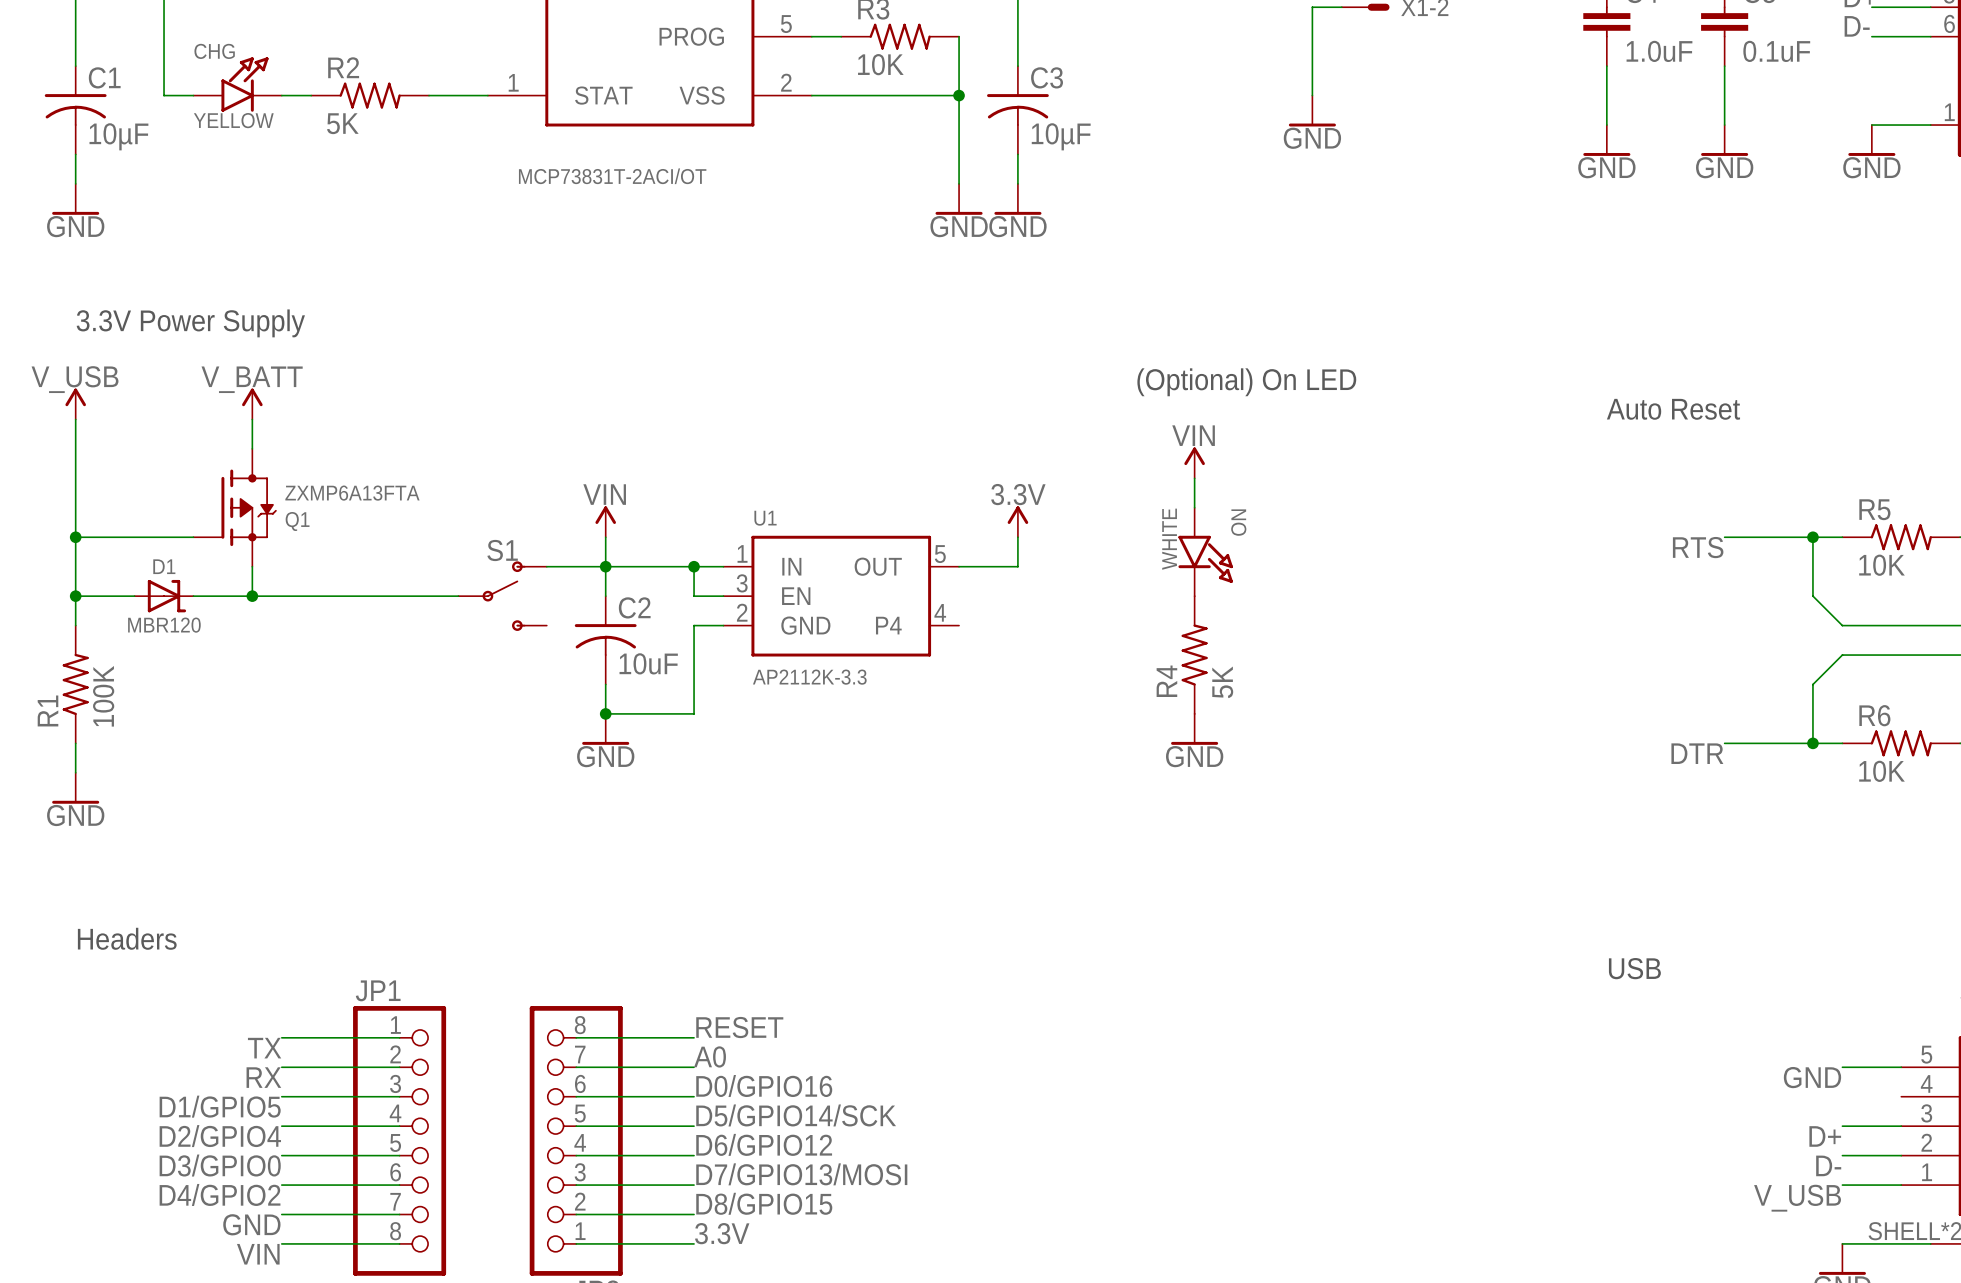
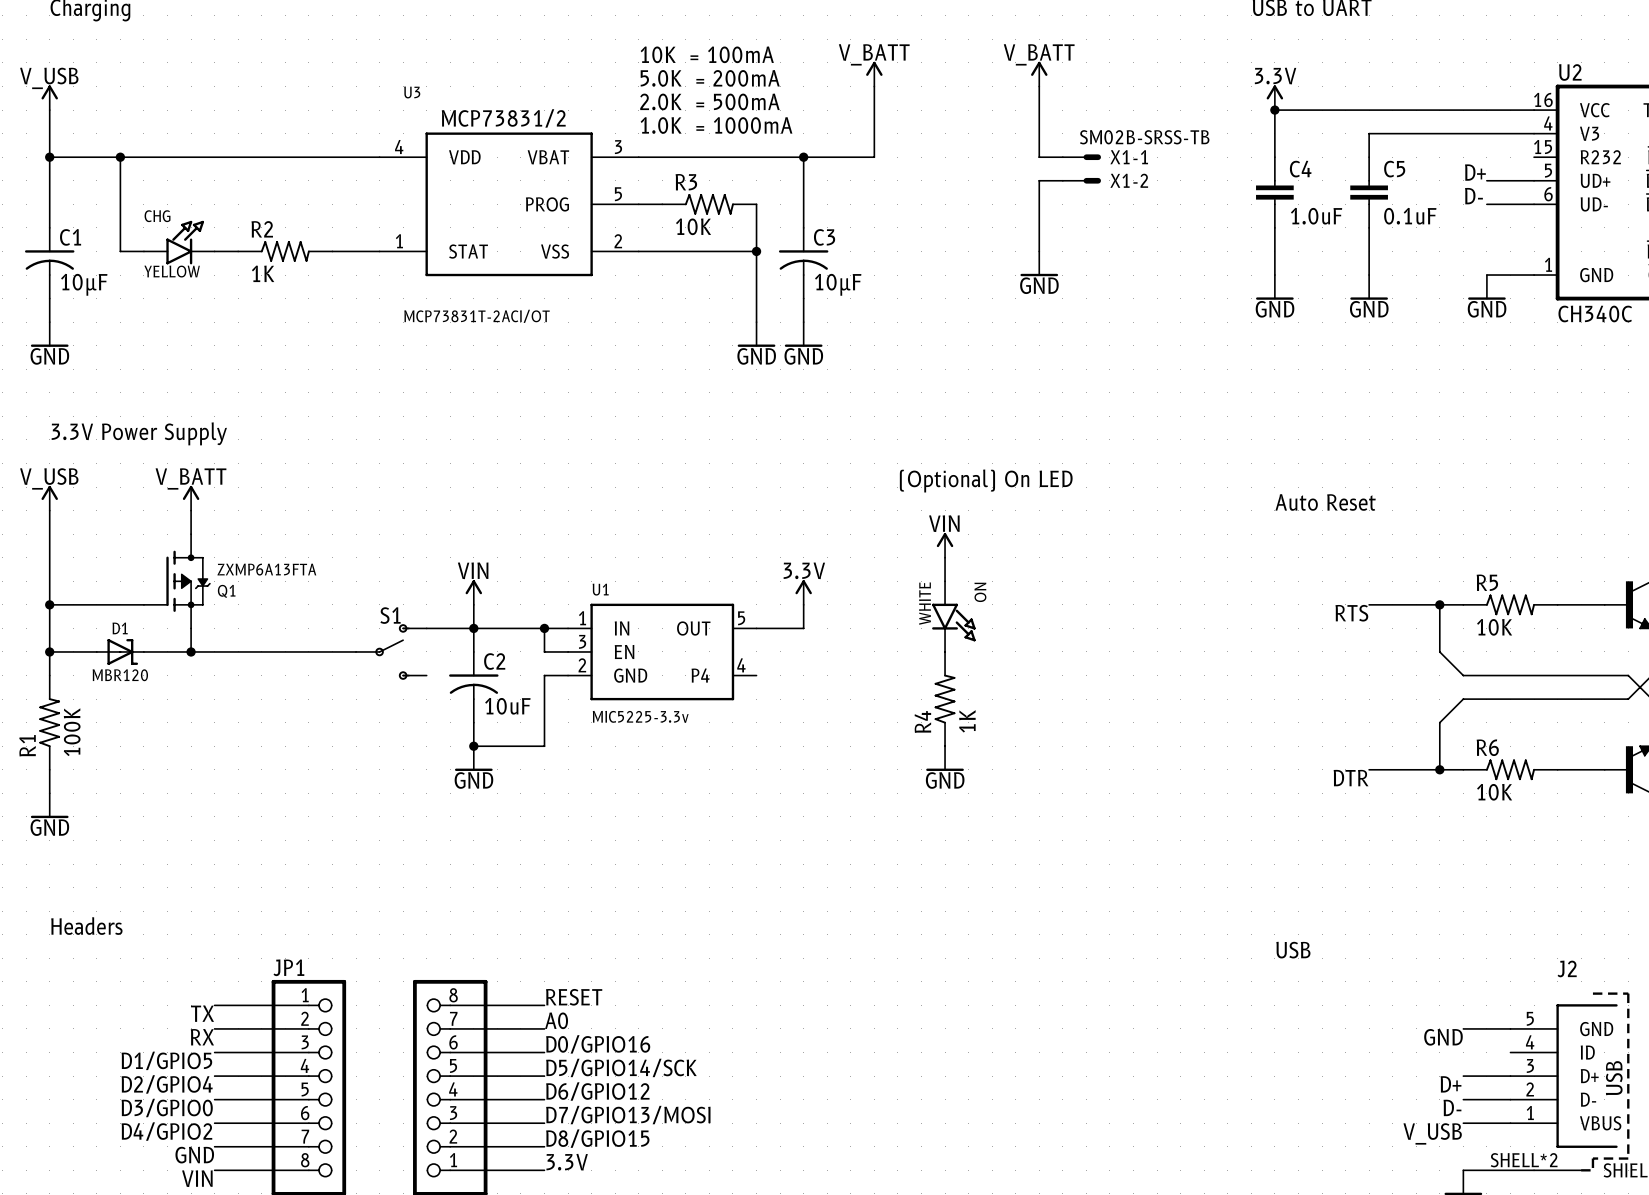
R2 value: 5K (342, 123) -> 1K (263, 273)
U1 value: AP2112K-3.3 (809, 677) -> MIC5225-3.3v (640, 716)
R4 value: 5K (1222, 682) -> 1K (967, 721)

